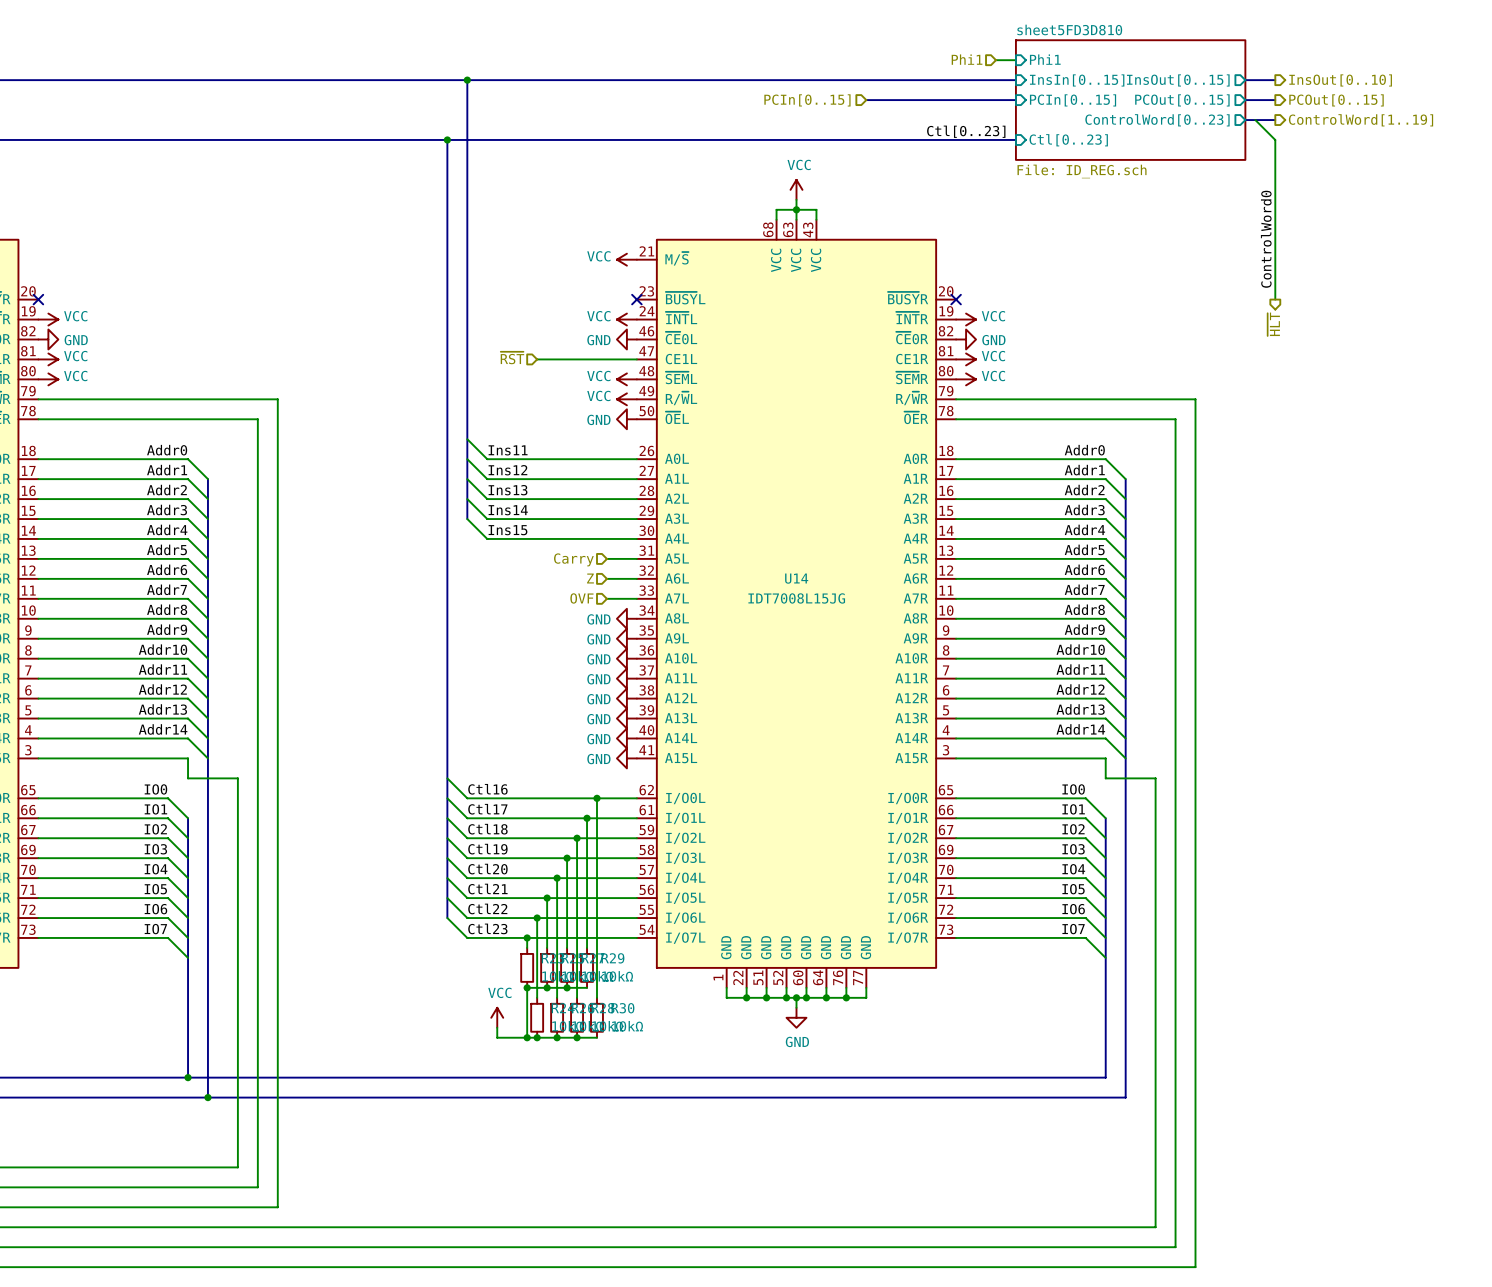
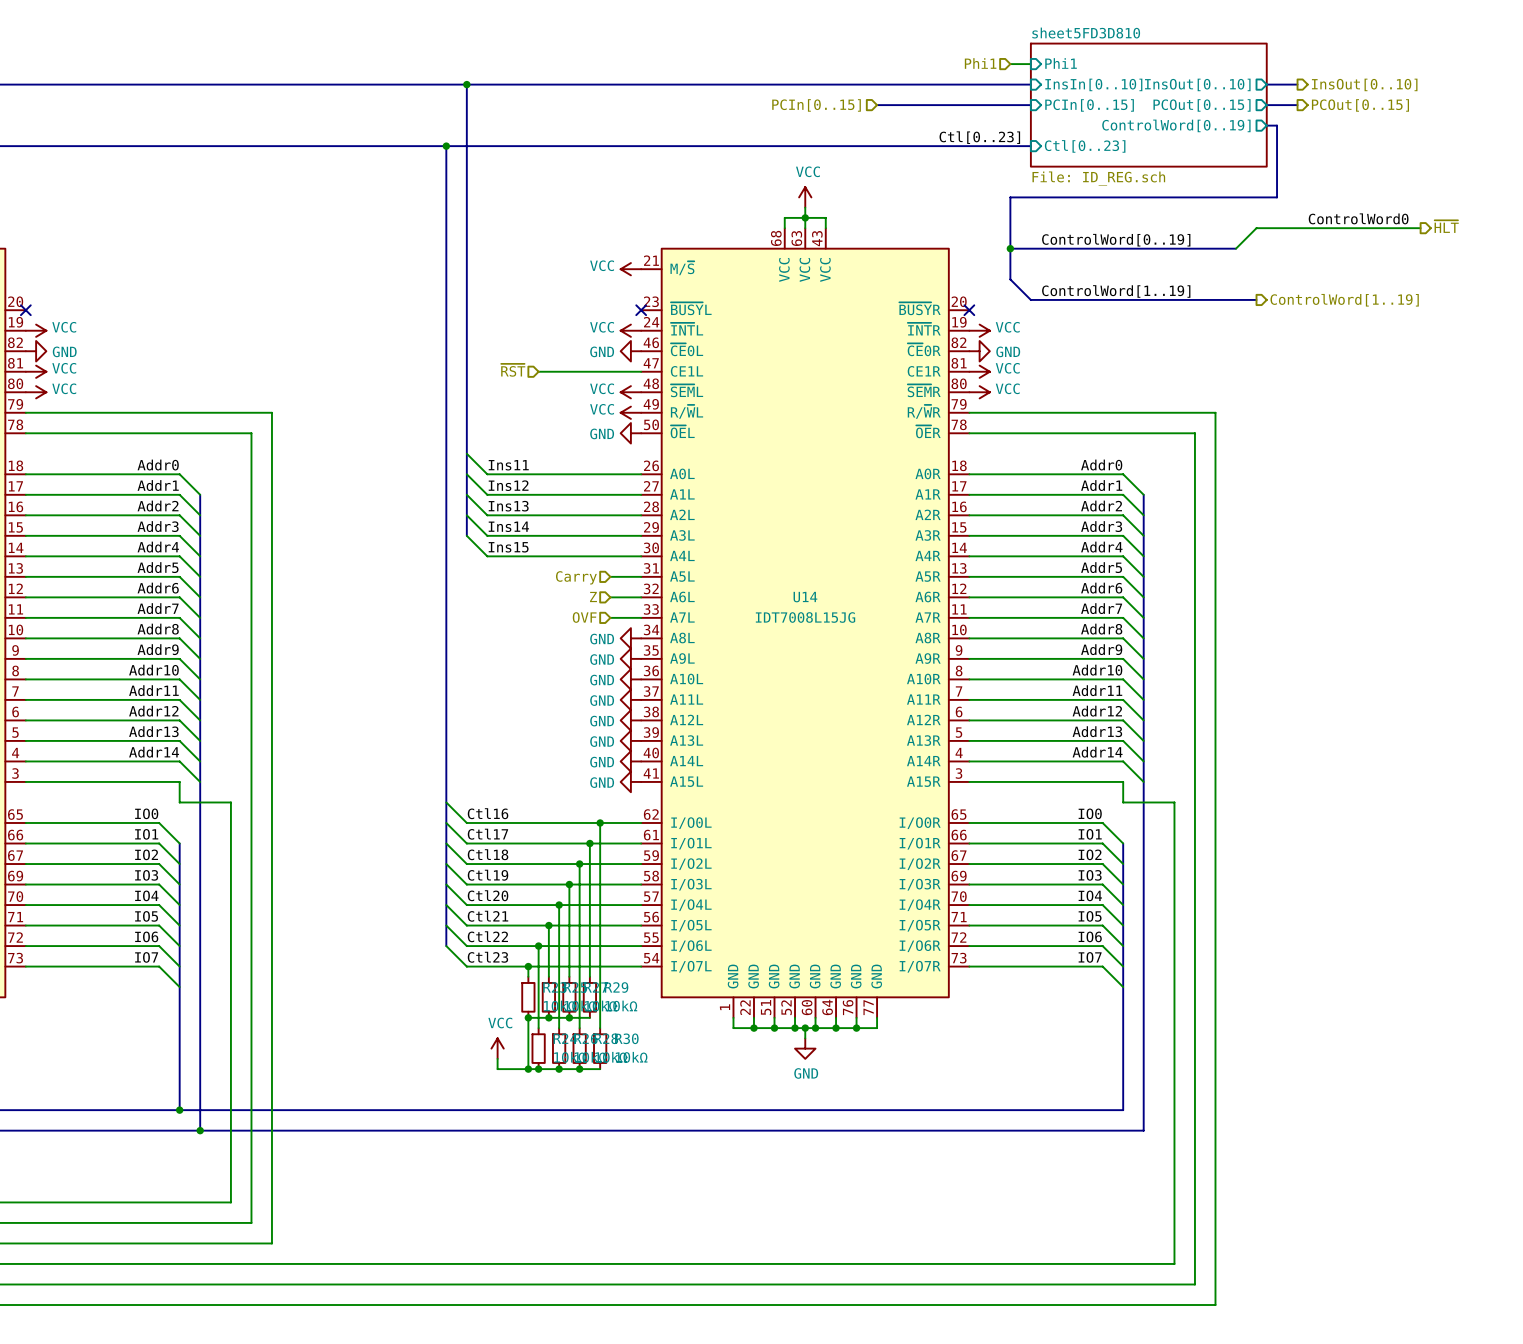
sheet pin: InsIn[0..15] (1077, 80) -> InsIn[0..10] (1093, 84)
sheet pin: InsOut[0..15] (1178, 80) -> InsOut[0..10] (1197, 84)
sheet pin: ControlWord[0..23] (1157, 120) -> ControlWord[0..19] (1176, 125)
bus: (1255, 120) (1275, 120) -> (1277, 125) (1277, 197) (1010, 197) (1010, 279) (1030, 299) (1256, 299)
wire: (1255, 120) (1275, 139) (1275, 299) -> none
hierarchical label position: ControlWord[1..19] (1361, 120) -> ControlWord[1..19] (1344, 300)
wire: none -> (1420, 228) (1256, 228) (1236, 248)
label: none -> ControlWord[0..19] (1116, 240)
bus: none -> (1010, 248) (1236, 248)
junction: none -> (1010, 248)
label rotation: 0° (1266, 239) -> 90° clockwise (1358, 218)
label: none -> ControlWord[1..19] (1116, 291)
hierarchical label rotation: 0° (1273, 324) -> 90° counterclockwise (1446, 226)
hierarchical label position: ~{HLT} (1273, 324) -> ~{HLT} (1446, 226)

